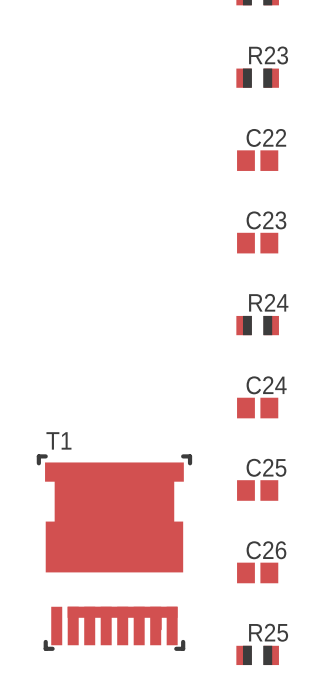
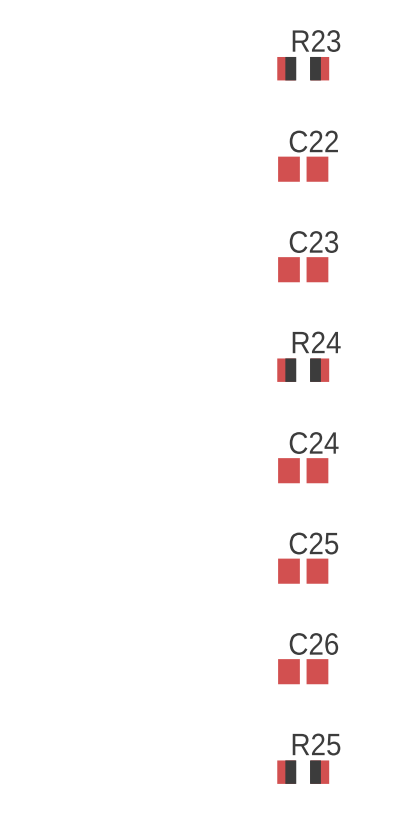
T1: (109, 557) -> none

